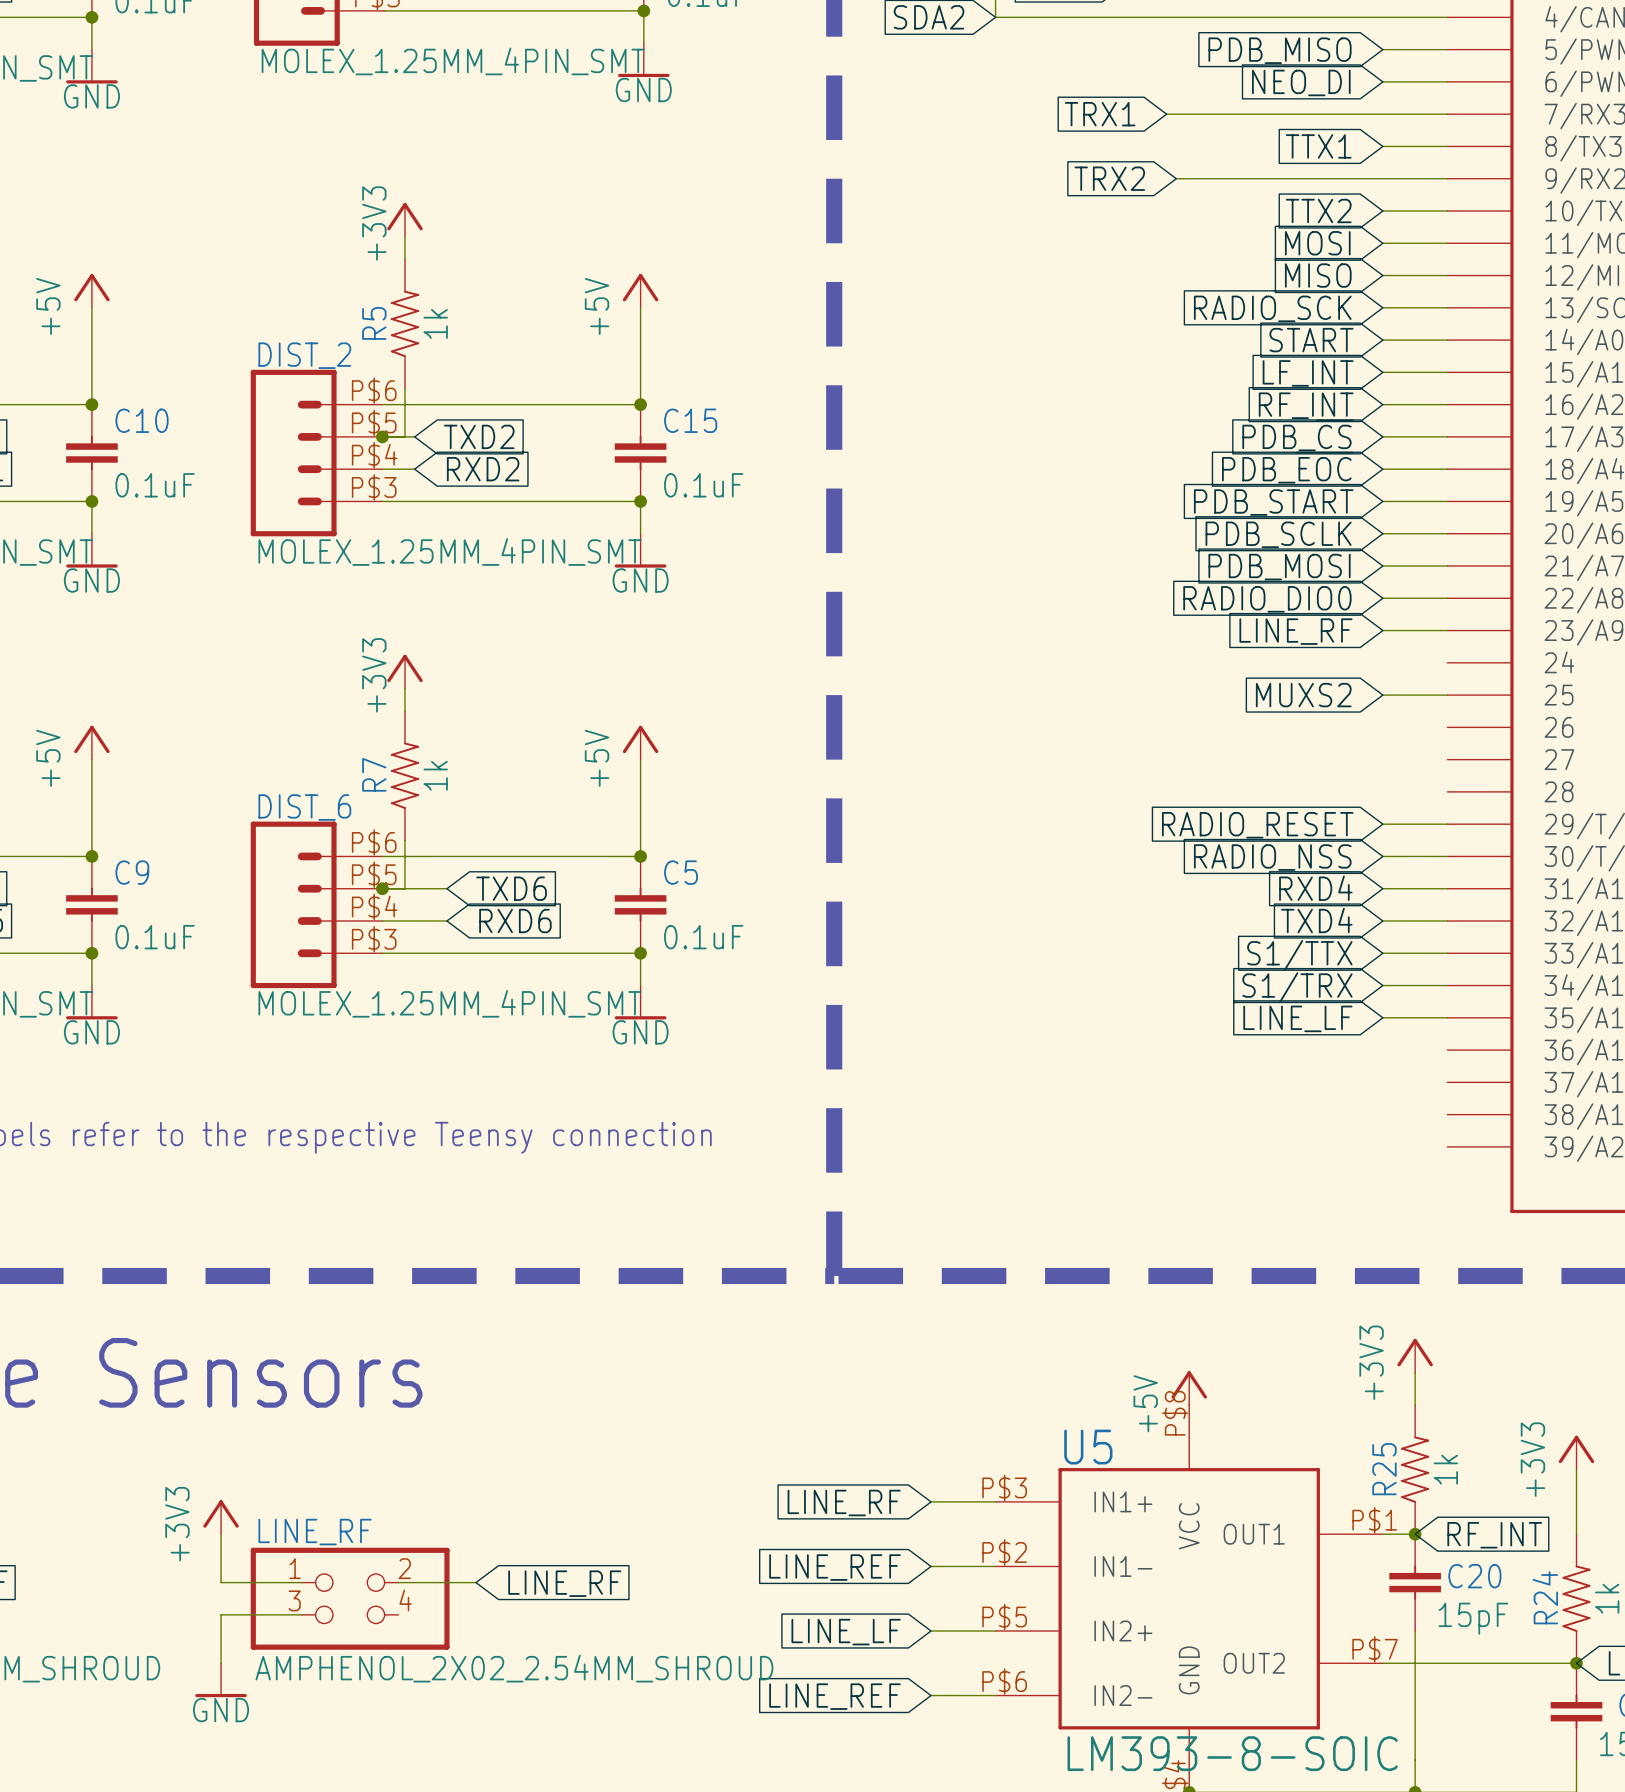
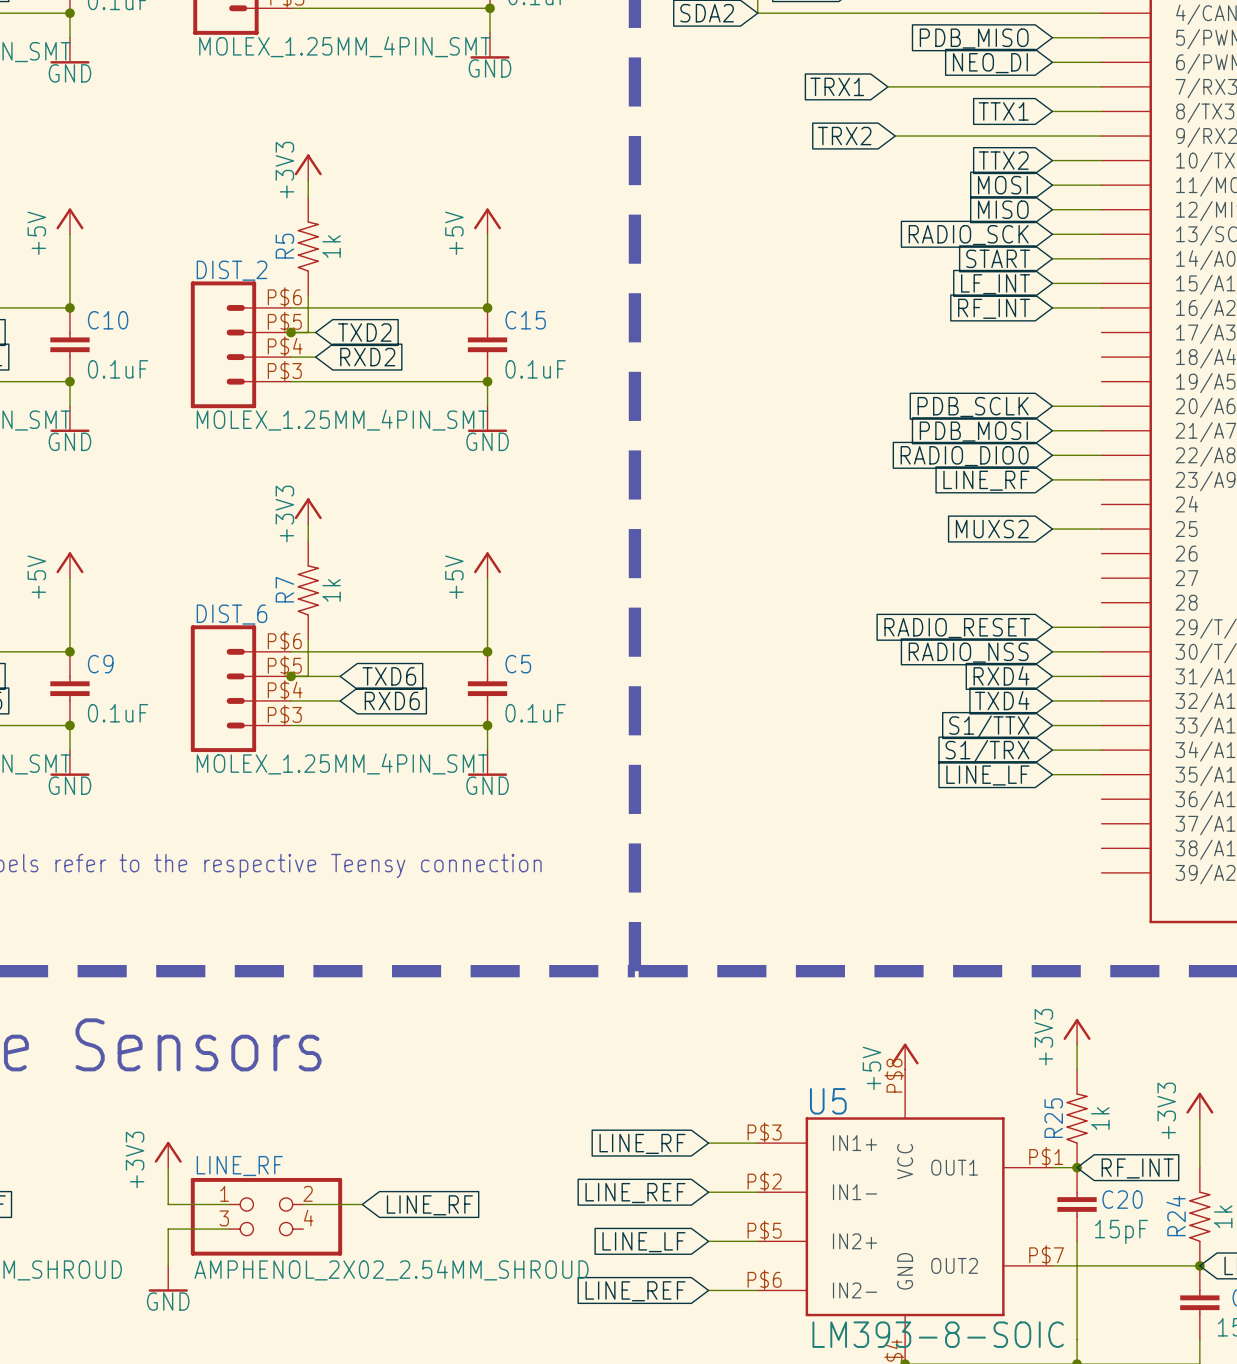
global label: PDB_~{CS} (1297, 435) -> none
wire: (1382, 436) (1447, 436) -> none
global label: PDB_~{EOC} (1287, 467) -> none
wire: (1382, 469) (1447, 469) -> none
wire: (1382, 501) (1447, 501) -> none
global label: PDB_START (1273, 502) -> none

